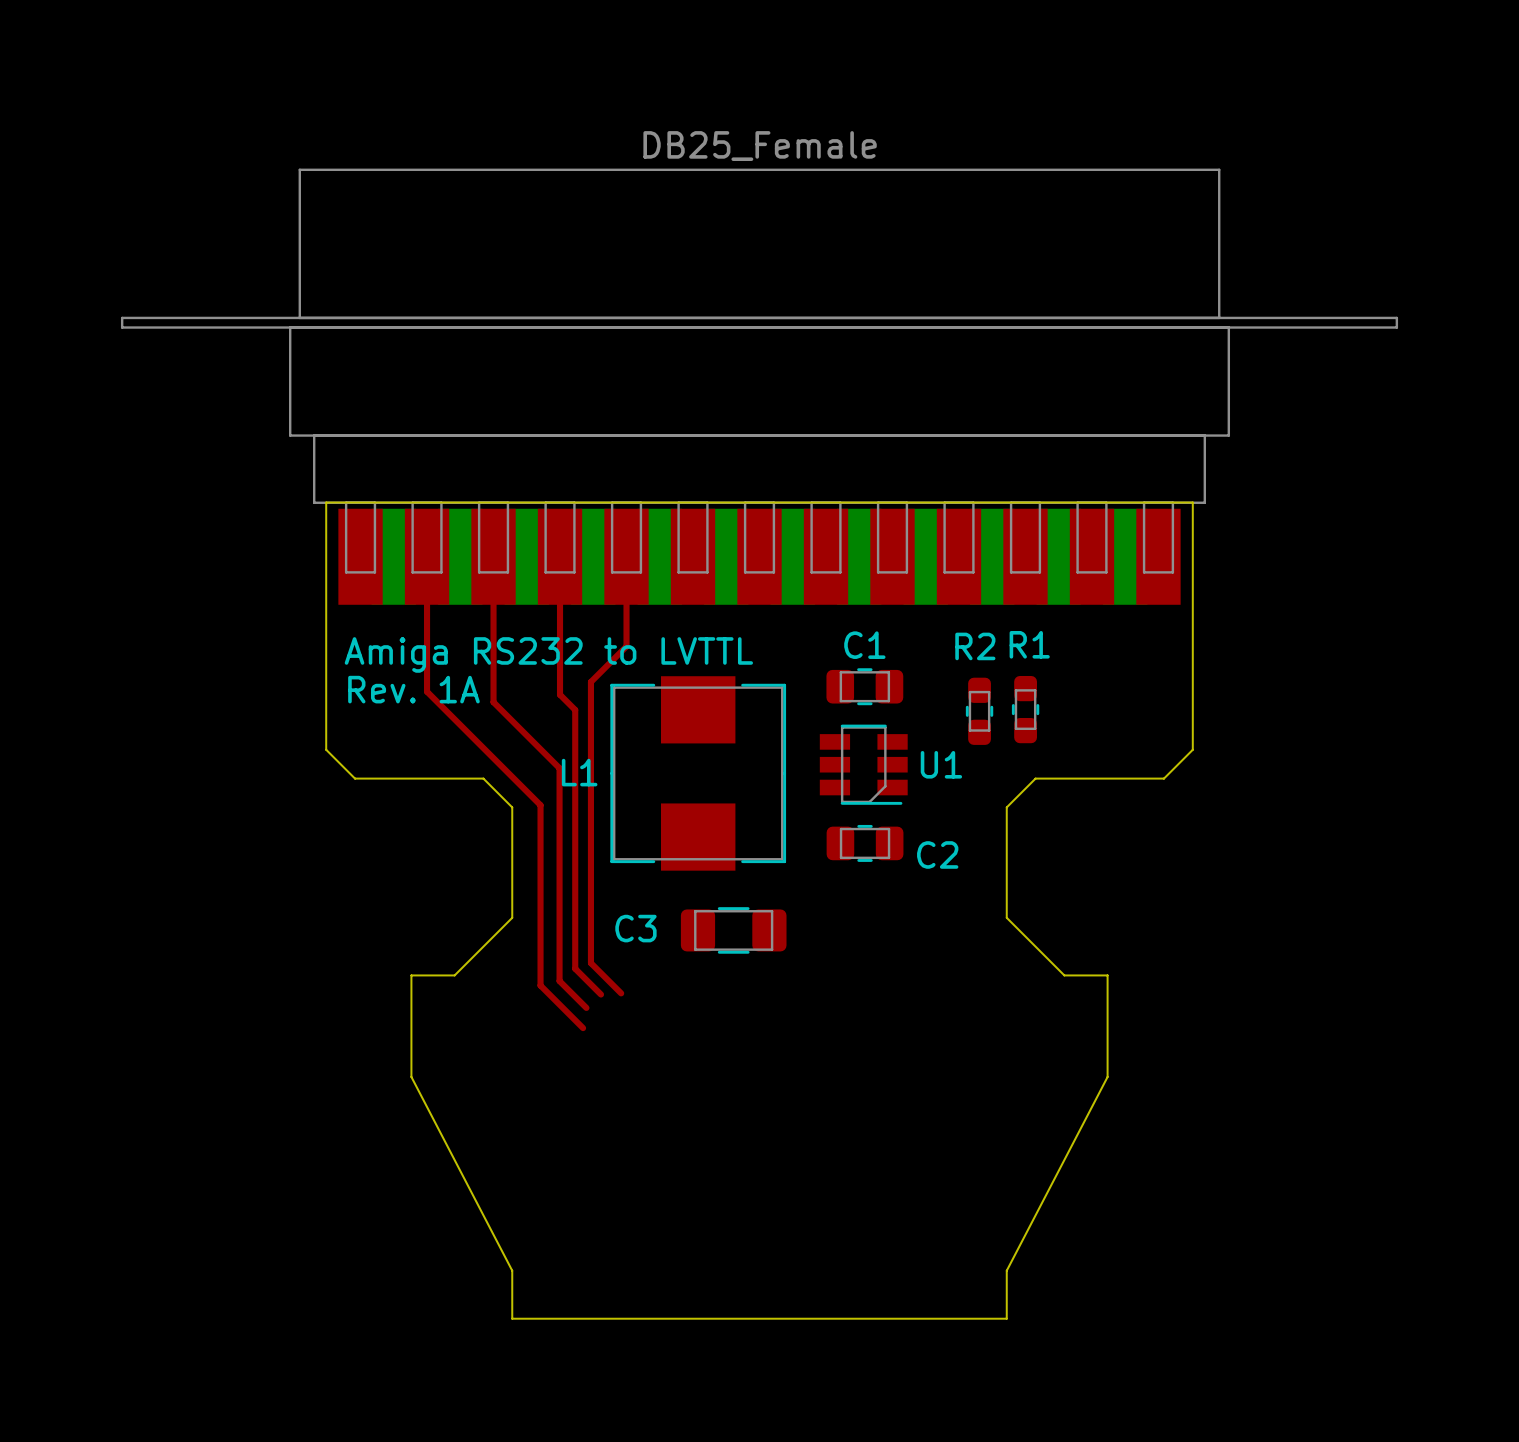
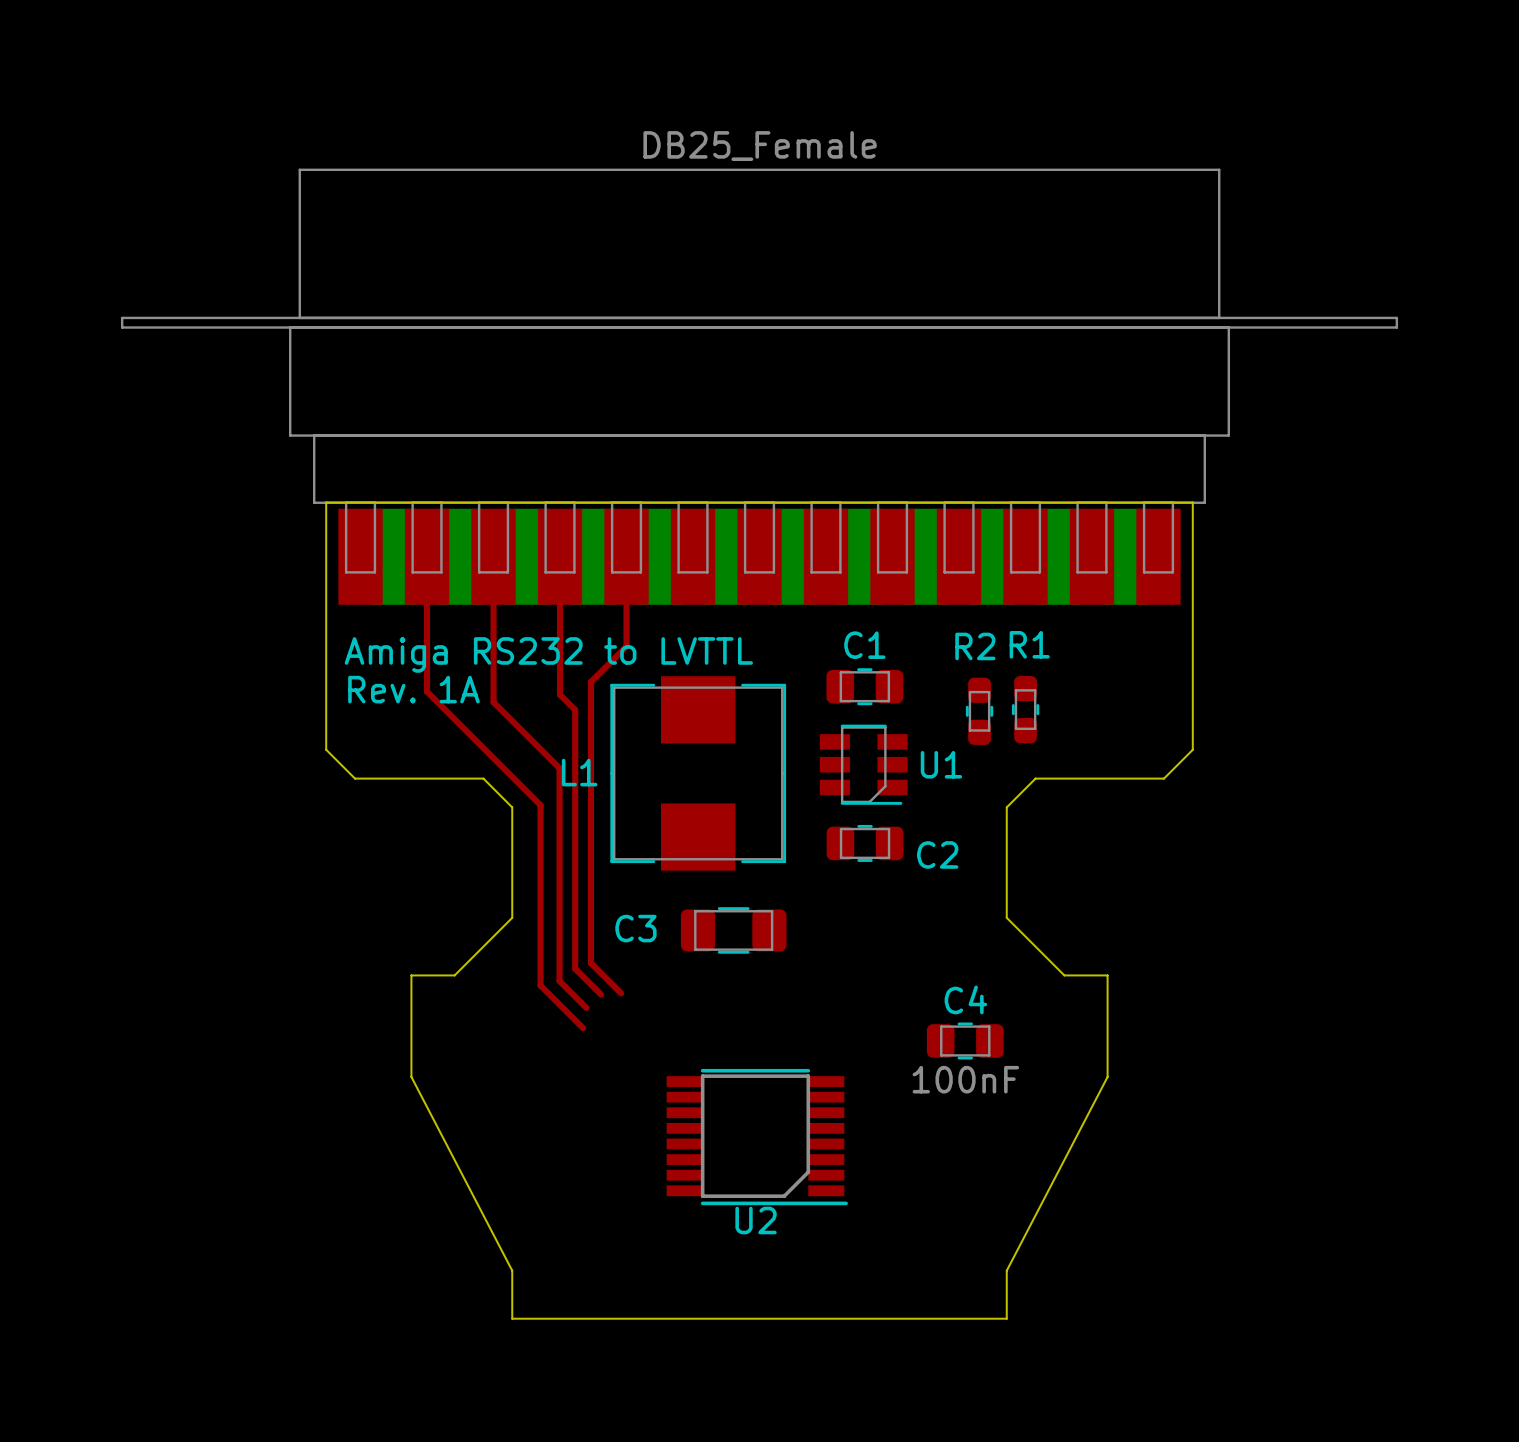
C4: none -> 100nF (965, 1040)
U2: none -> (757, 1137)

